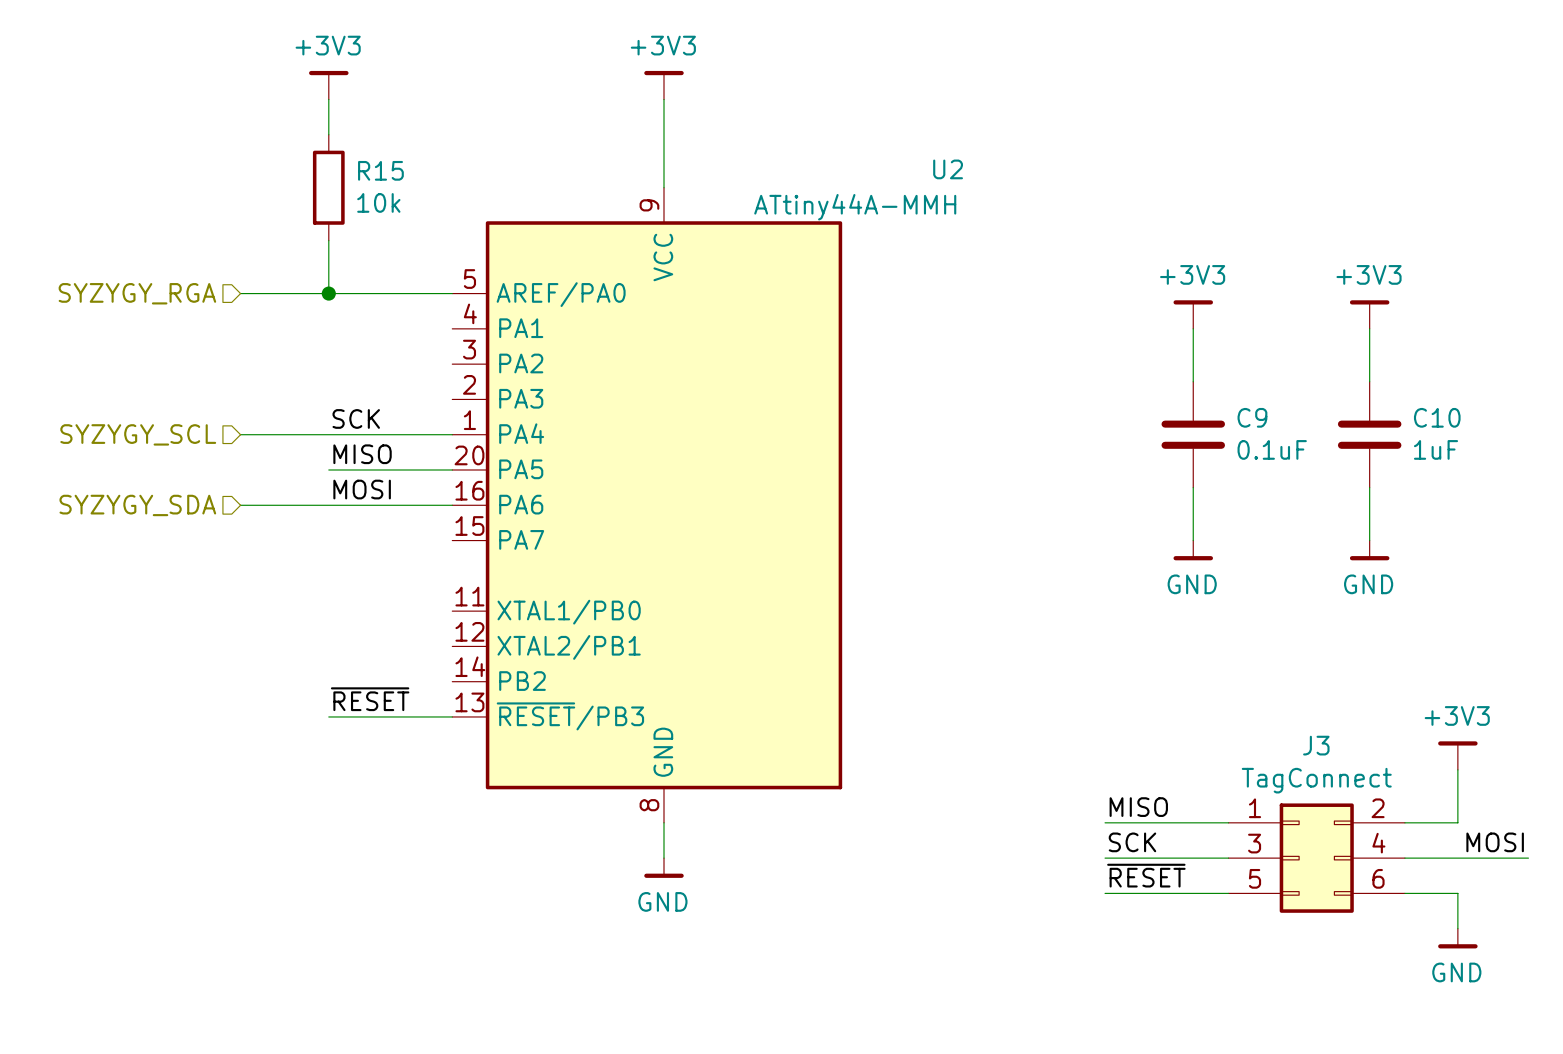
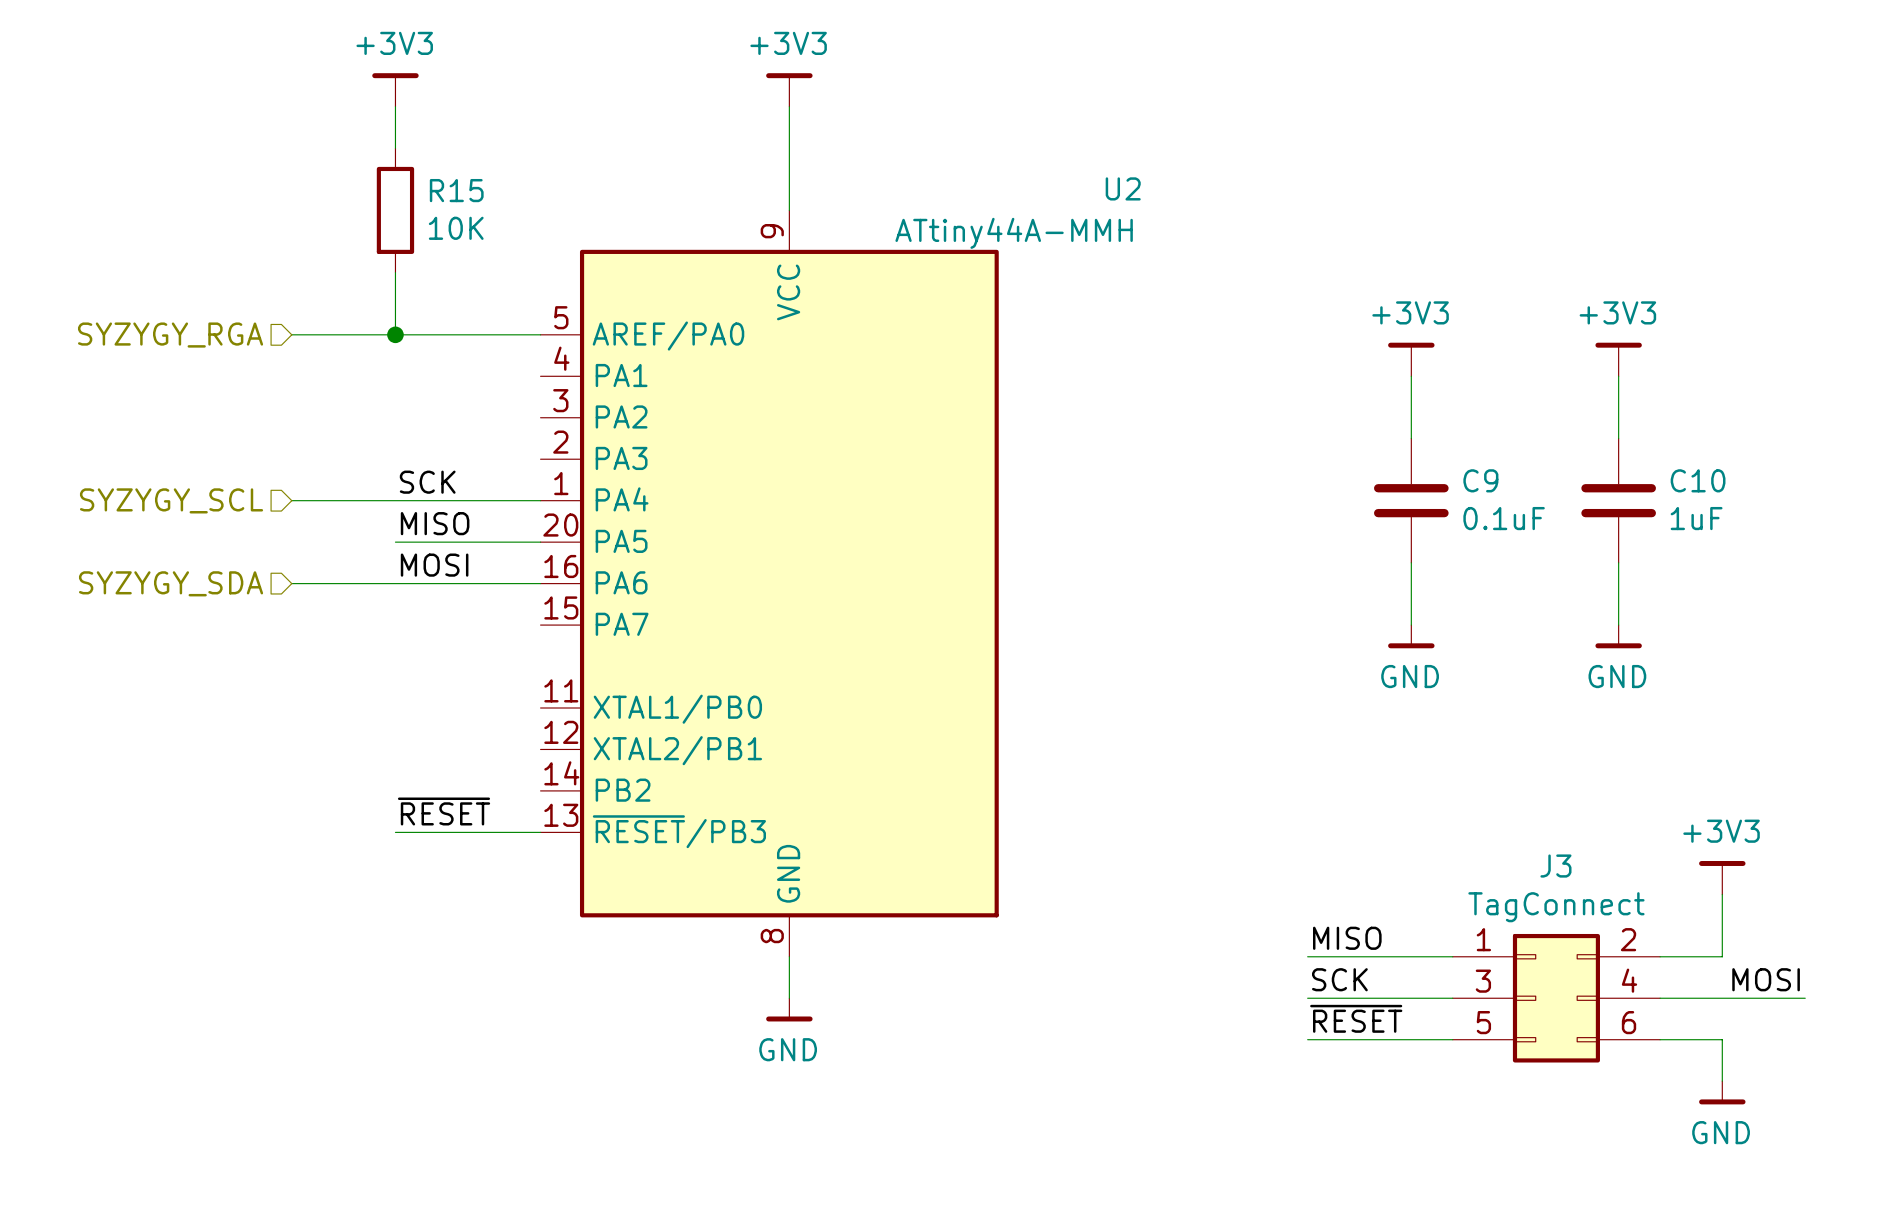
R15 value: 10k (378, 202) -> 10K (456, 228)

